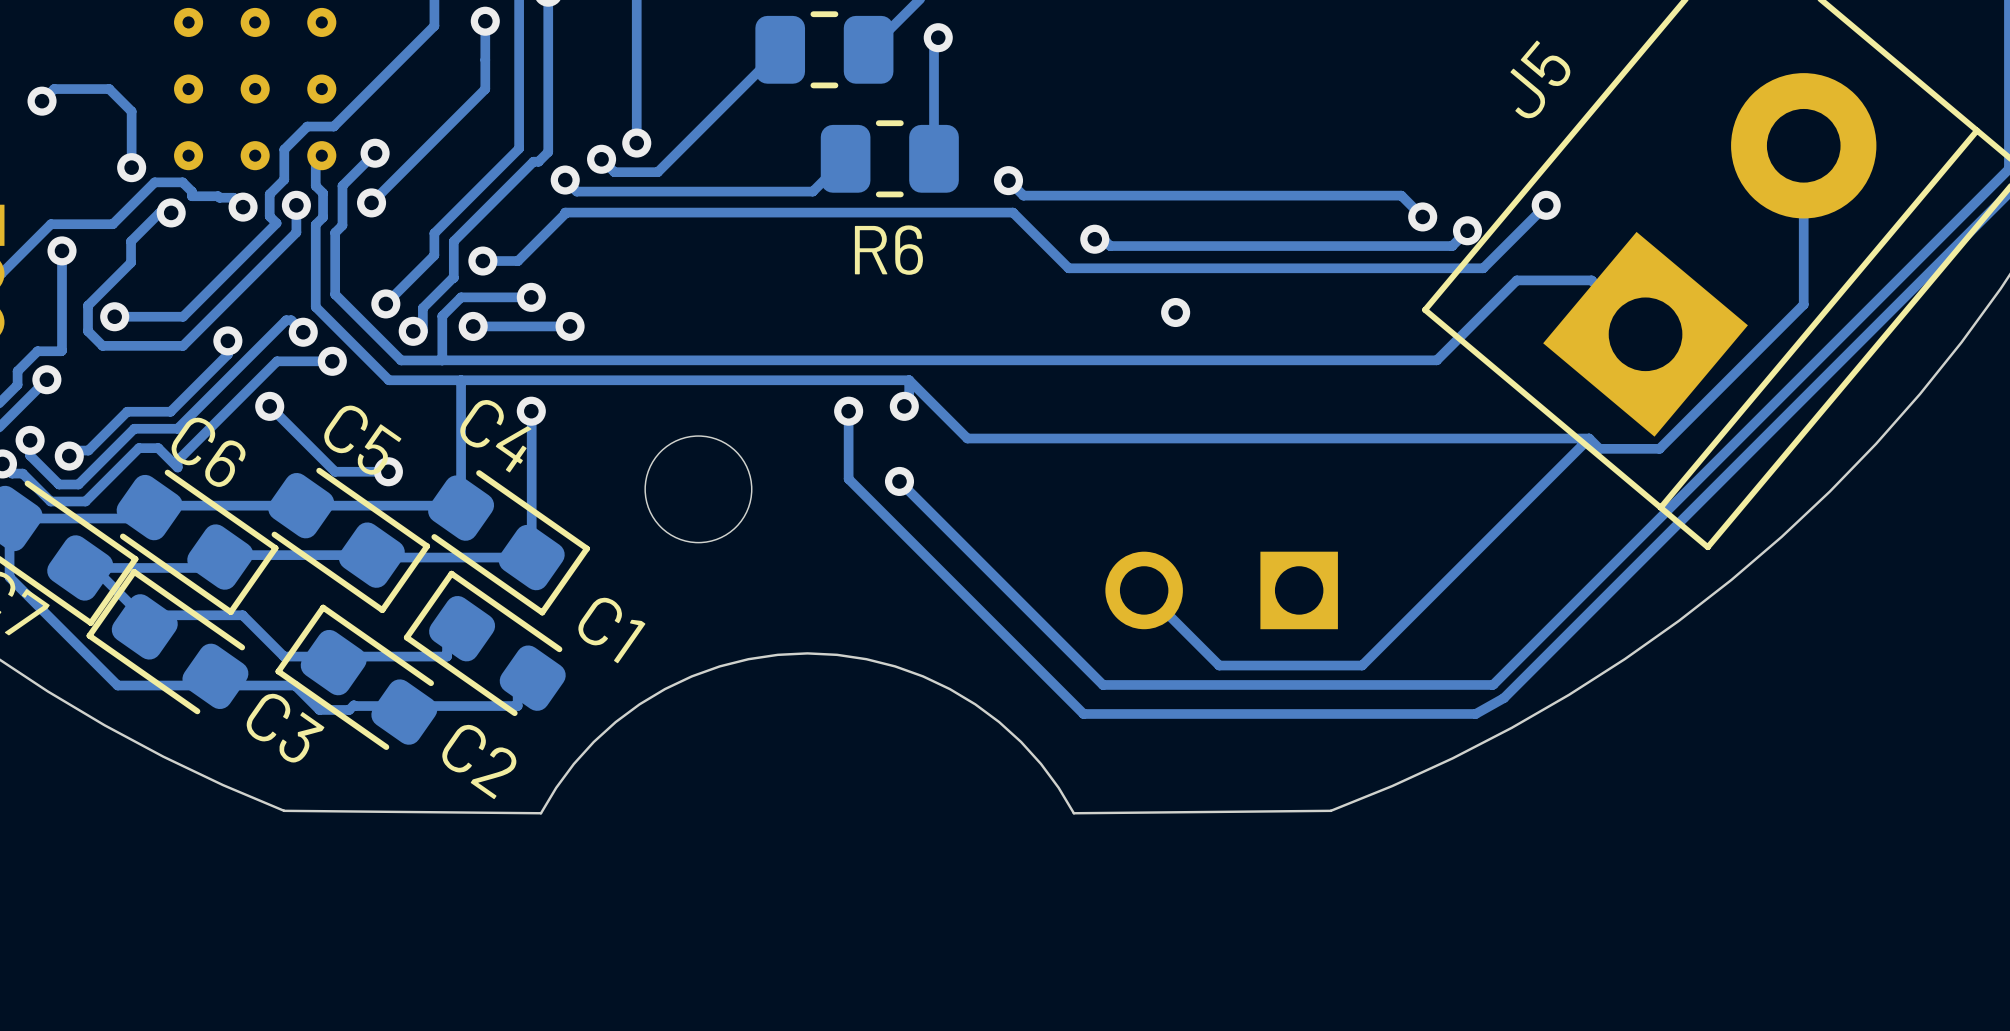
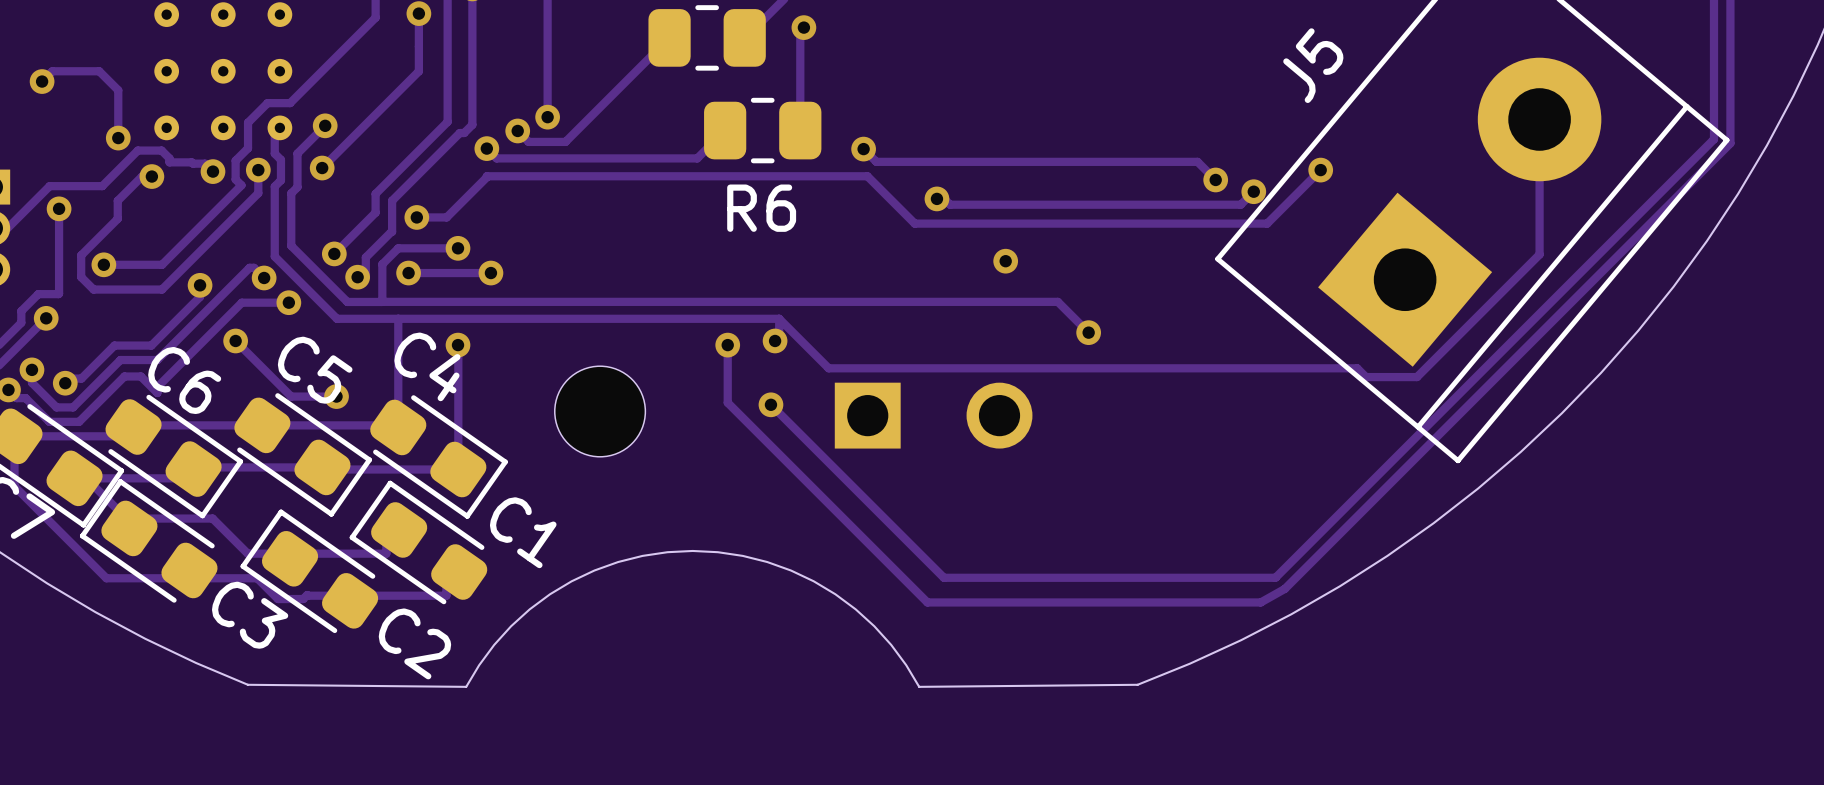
track: (1645, 334) (1591, 280) (1516, 280) (1436, 360) (1237, 360) -> (1088, 332) (1057, 301)
via: none -> (1088, 332)
track: (1589, 438) (1362, 665) (1219, 665) (1144, 590) -> none
part rotation: 0° (1221, 590) -> 180° (933, 415)
part position: (1221, 590) -> (933, 415)

